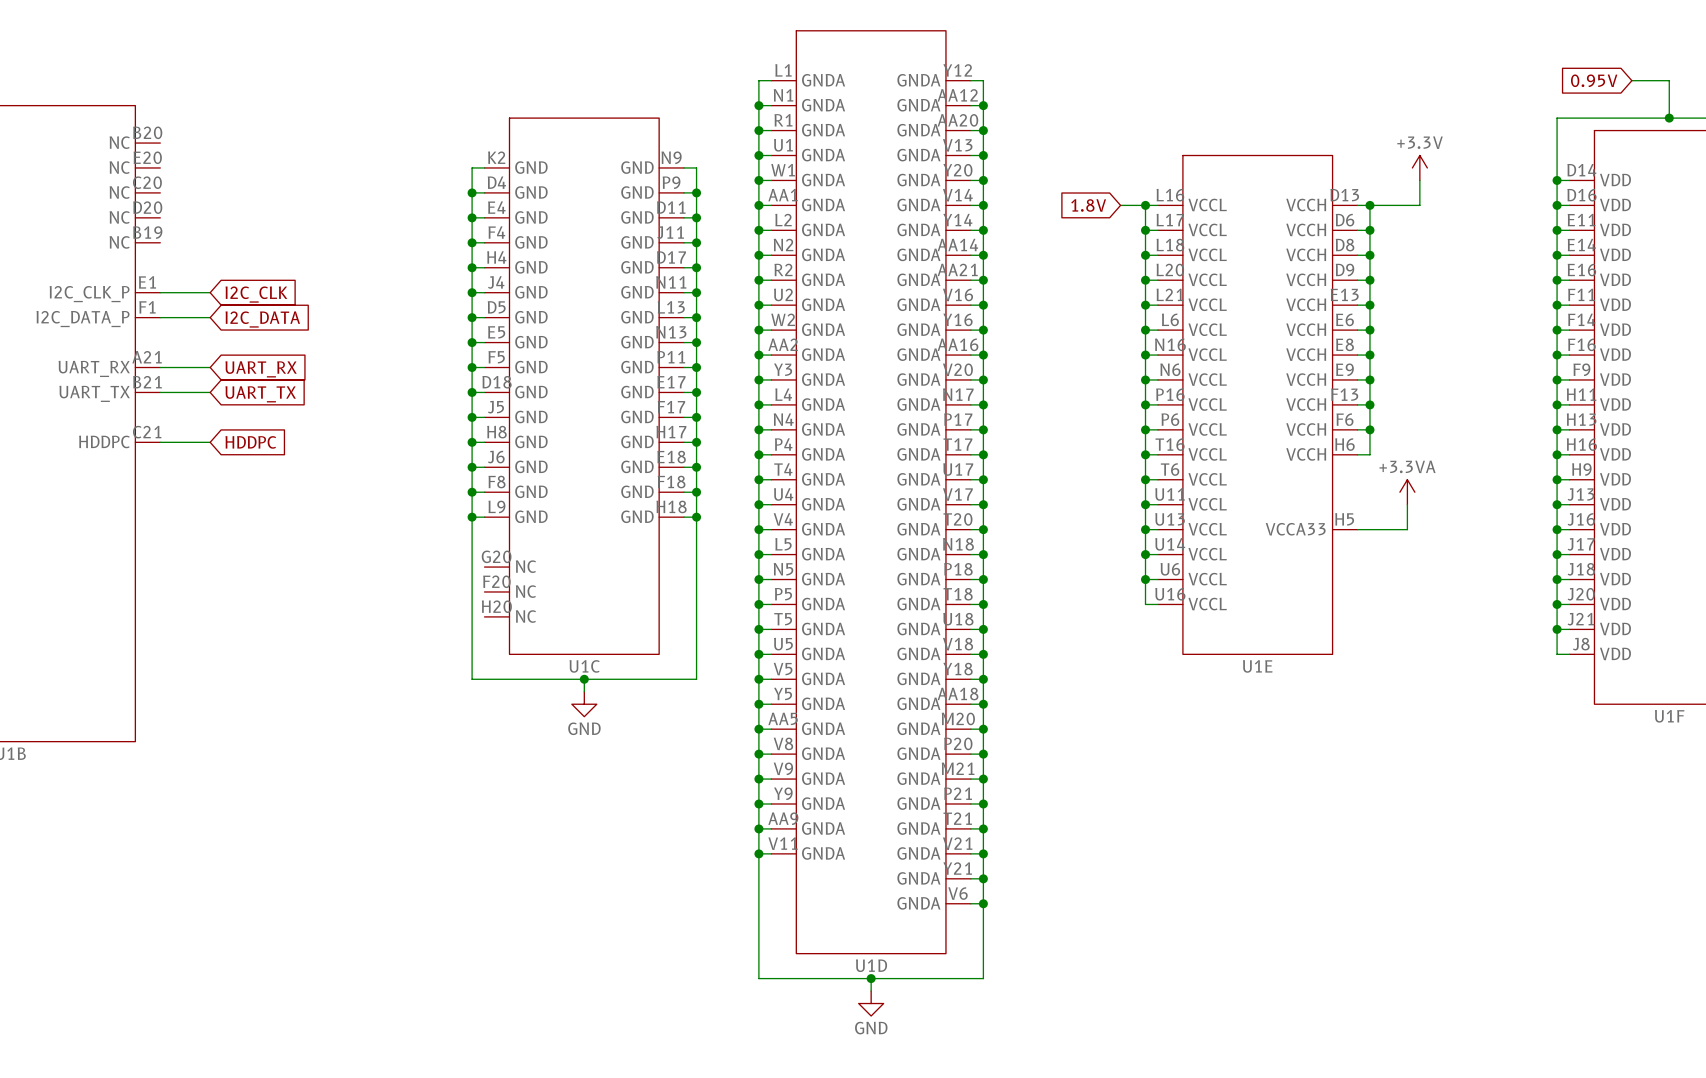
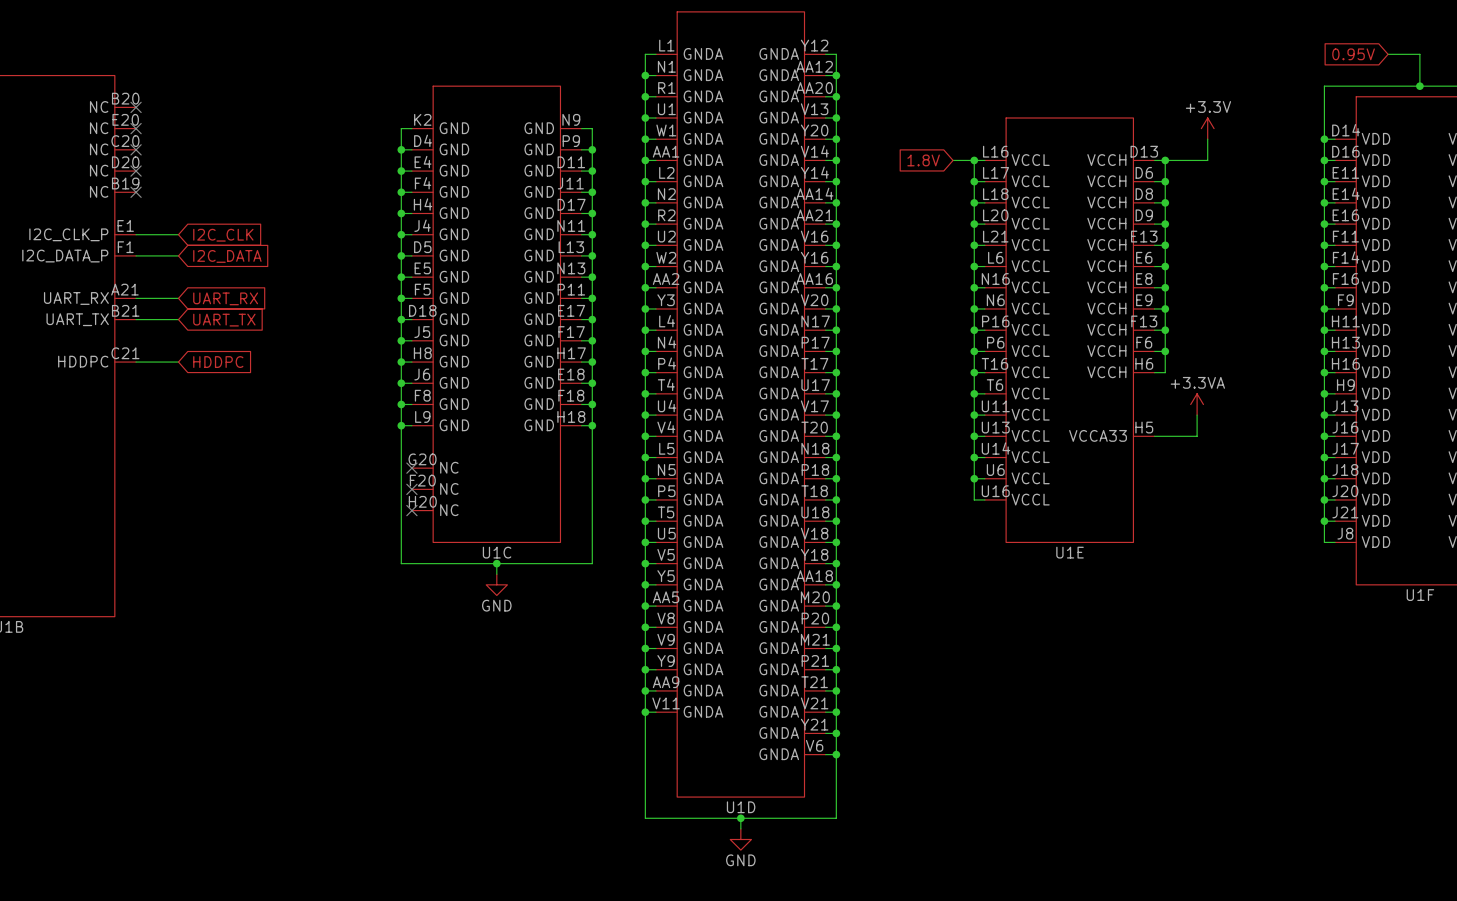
no-connect mark: none -> (136, 107)
no-connect mark: none -> (136, 128)
no-connect mark: none -> (136, 149)
no-connect mark: none -> (136, 171)
no-connect mark: none -> (136, 192)
no-connect mark: none -> (411, 468)
no-connect mark: none -> (411, 489)
no-connect mark: none -> (411, 510)

